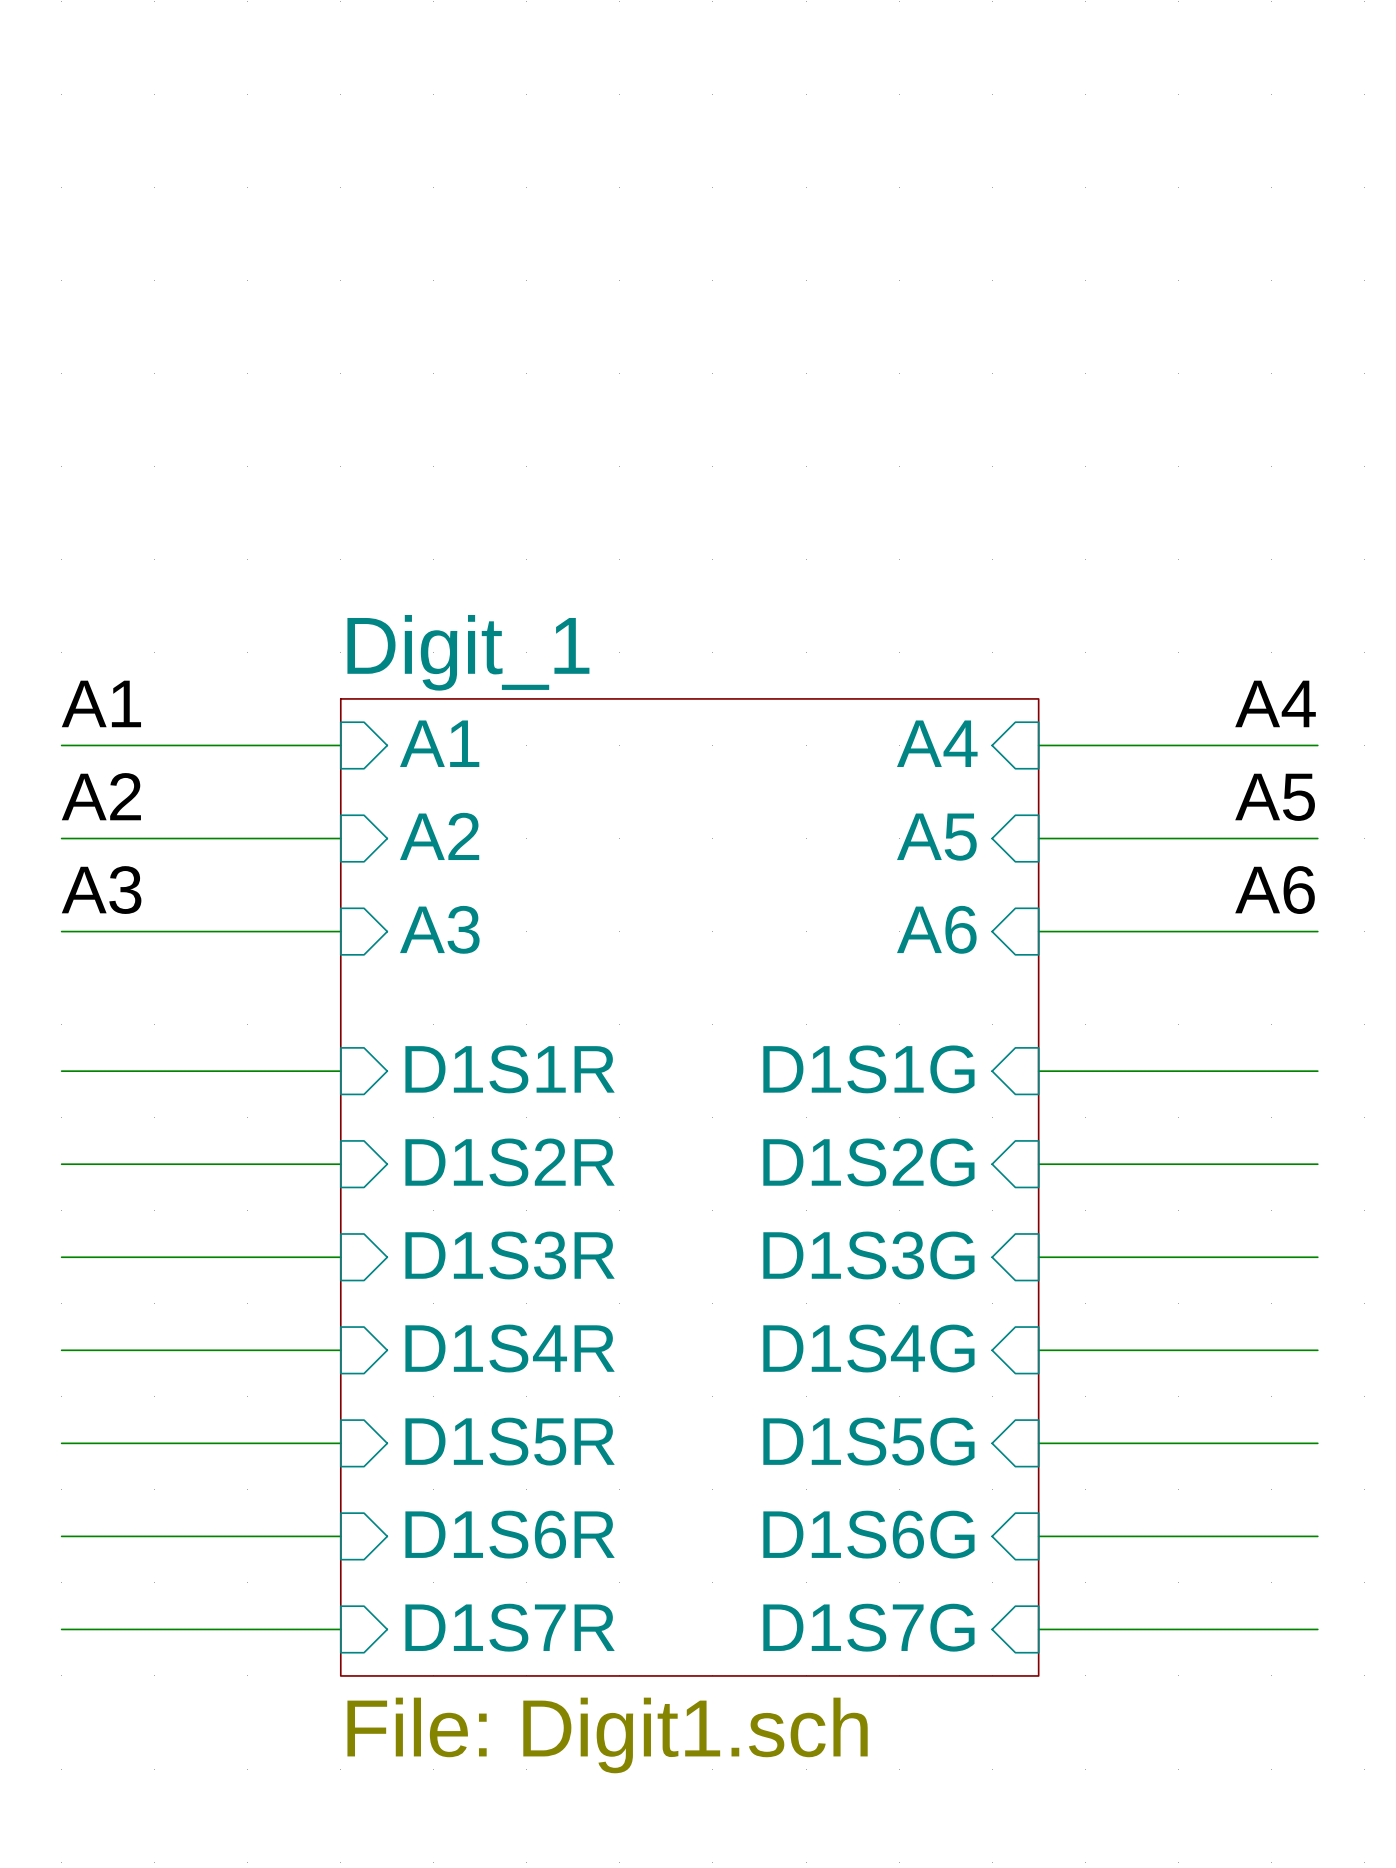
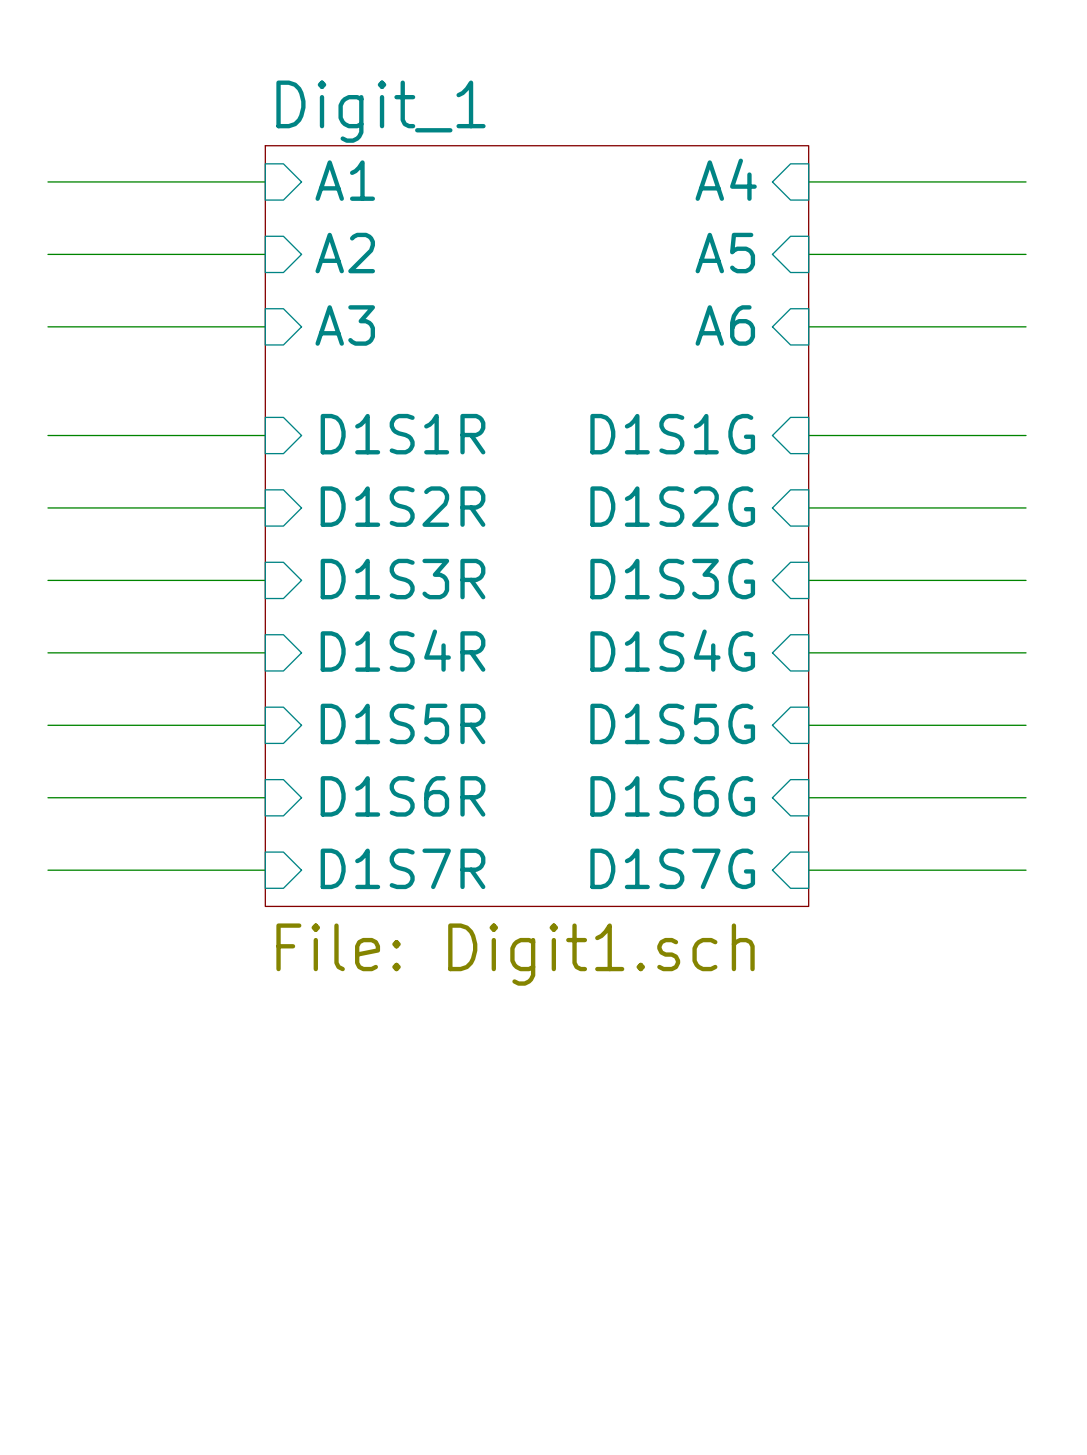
sheet pin: none -> A1 (345, 180)
sheet pin: none -> A4 (726, 179)
wire: none -> (47, 181) (265, 181)
wire: none -> (808, 181) (1026, 181)
sheet pin: none -> A2 (345, 253)
sheet pin: none -> A5 (725, 253)
wire: none -> (47, 254) (265, 254)
wire: none -> (808, 254) (1026, 254)
sheet pin: none -> A3 (345, 325)
sheet pin: none -> A6 (725, 325)
label: A1 (101, 703) -> none
label: A4 (1275, 703) -> none
sheet pin: A1 (439, 743) -> D1S3R (403, 579)
sheet pin: A4 (937, 743) -> D1S3G (672, 579)
label: A2 (101, 796) -> none
label: A5 (1275, 797) -> none
sheet pin: A2 (439, 836) -> D1S4R (403, 650)
sheet pin: A5 (936, 837) -> D1S4G (672, 650)
label: A3 (101, 890) -> none
label: A6 (1275, 890) -> none
sheet pin: A3 (439, 929) -> D1S5R (403, 723)
sheet pin: A6 (936, 929) -> D1S5G (672, 723)
sheet pin position: D1S1R (510, 1069) -> D1S1R (403, 434)
sheet pin position: D1S1G (868, 1069) -> D1S1G (672, 434)
wire: (61, 1071) (340, 1071) -> (47, 435) (265, 435)
wire: (1038, 1071) (1317, 1071) -> (808, 435) (1026, 435)
sheet pin position: D1S2R (510, 1162) -> D1S2R (403, 506)
sheet pin position: D1S2G (868, 1162) -> D1S2G (672, 506)
wire: (61, 1164) (340, 1164) -> (47, 507) (265, 507)
wire: (1038, 1164) (1317, 1164) -> (808, 507) (1026, 507)
sheet Digit_1 position: (689, 1187) -> (537, 526)
sheet pin: D1S3R (510, 1255) -> none
sheet pin: D1S3G (868, 1255) -> none
wire: (61, 1257) (340, 1257) -> (47, 326) (265, 326)
wire: (1038, 1257) (1317, 1257) -> (808, 326) (1026, 326)
sheet pin: D1S4R (510, 1348) -> none
sheet pin: D1S4G (868, 1348) -> none
wire: (61, 1350) (340, 1350) -> none
wire: (1038, 1350) (1317, 1350) -> none
sheet pin: D1S5R (510, 1441) -> none
sheet pin: D1S5G (868, 1441) -> none
wire: (61, 1443) (340, 1443) -> none
wire: (1038, 1443) (1317, 1443) -> none
sheet pin position: D1S6R (510, 1534) -> D1S6R (403, 796)
sheet pin position: D1S6G (868, 1534) -> D1S6G (672, 796)
wire: (61, 1536) (340, 1536) -> (47, 797) (265, 797)
wire: (1038, 1536) (1317, 1536) -> (808, 797) (1026, 797)
sheet pin position: D1S7R (510, 1627) -> D1S7R (403, 868)
sheet pin position: D1S7G (868, 1627) -> D1S7G (672, 868)
wire: (61, 1629) (340, 1629) -> (47, 870) (265, 870)
wire: (1038, 1629) (1317, 1629) -> (808, 870) (1026, 870)

